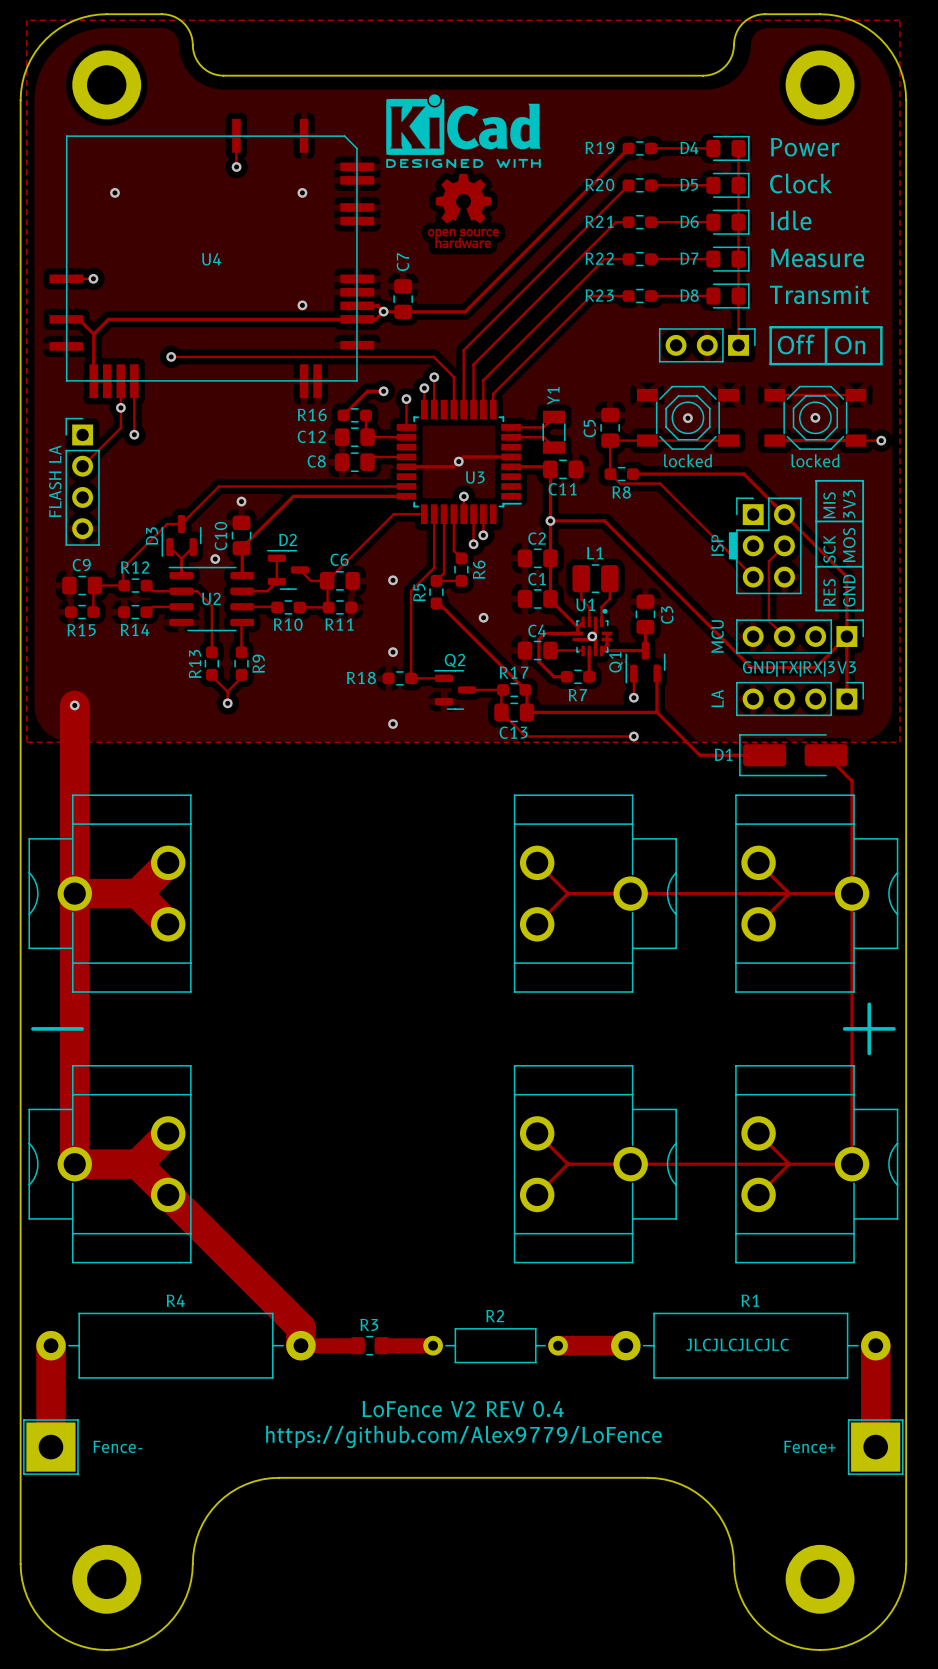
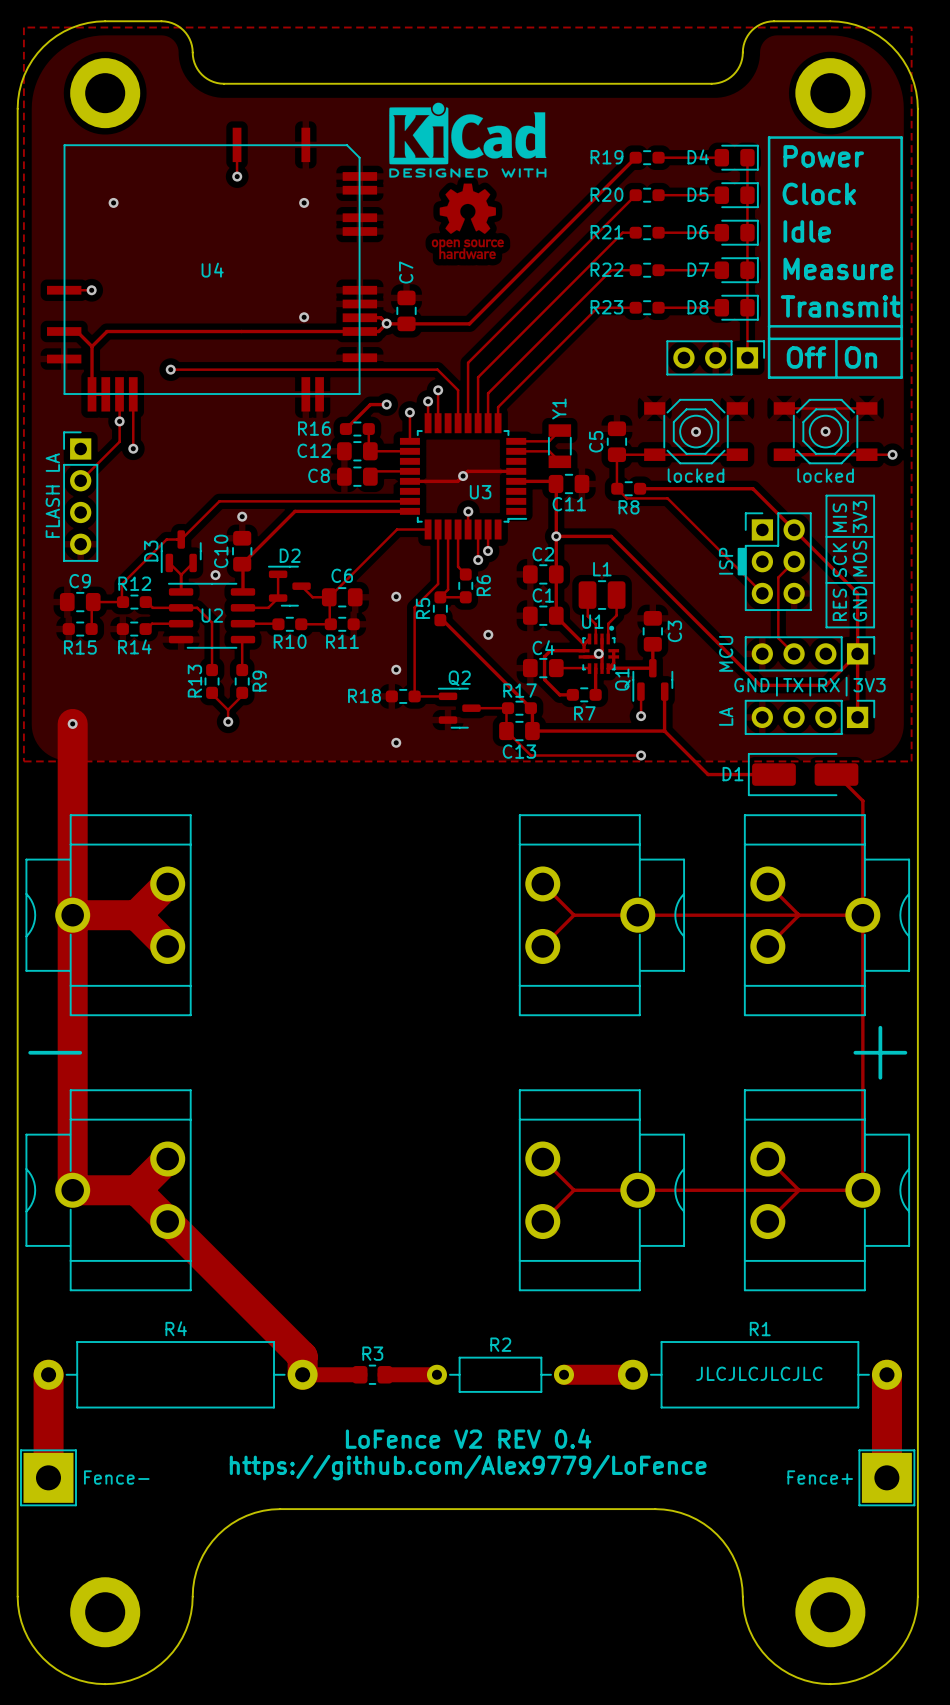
line: none -> (769, 137) (769, 377) (901, 377) (901, 137) (769, 137)
line: none -> (769, 326) (901, 326)
line: none -> (769, 338) (901, 338)
line: (770, 327) (881, 327) (881, 364) (770, 364) (770, 327) -> none

